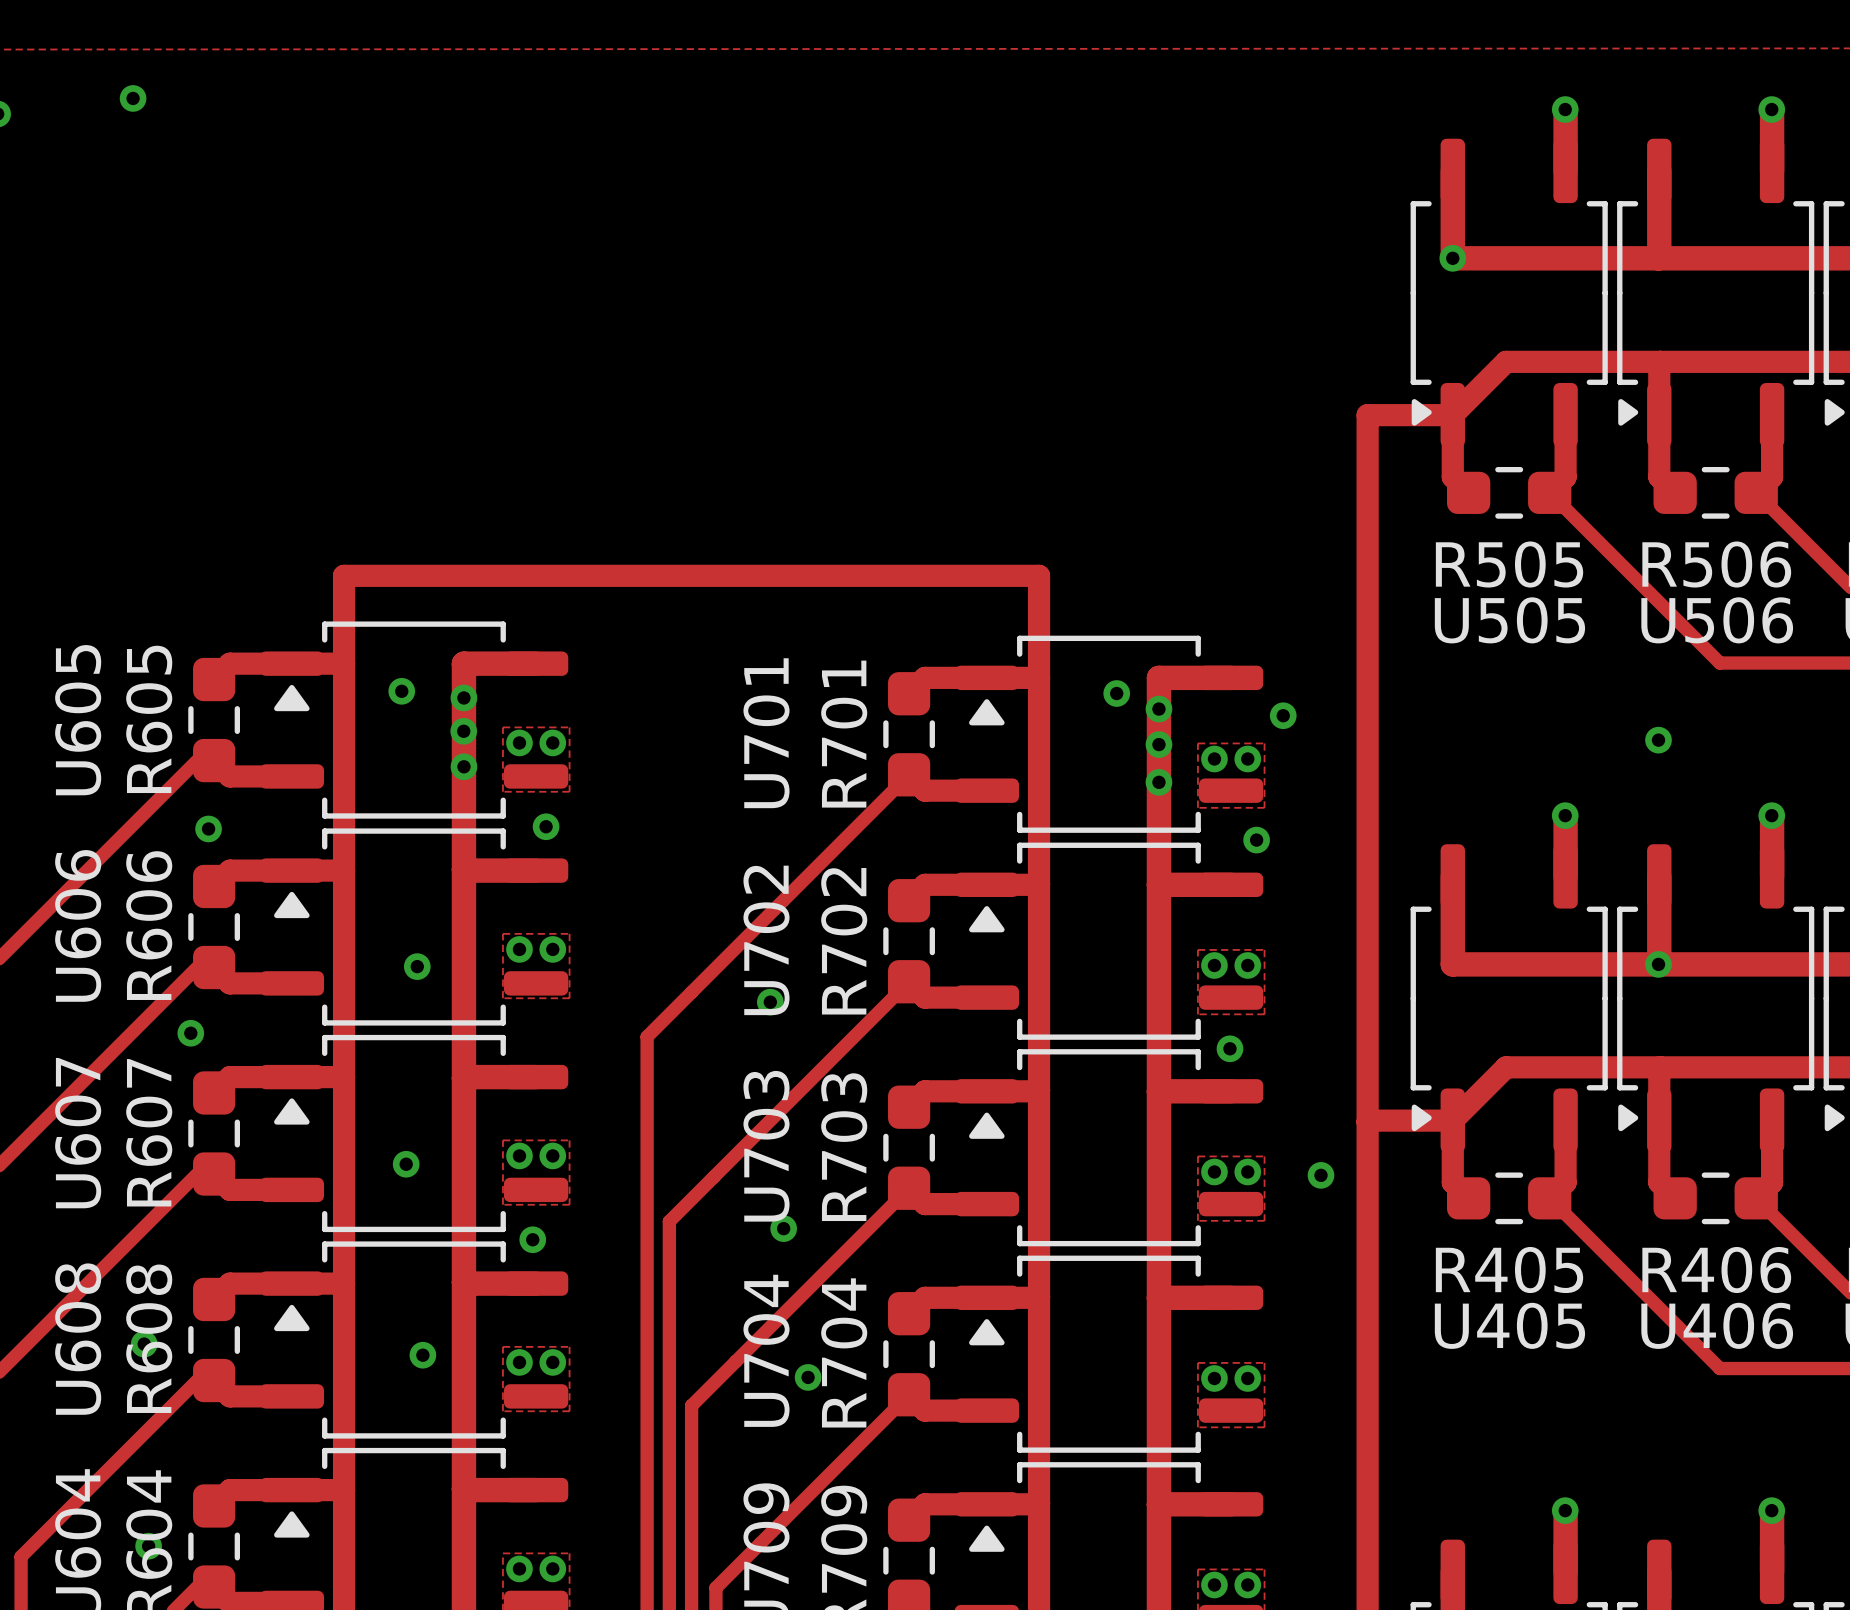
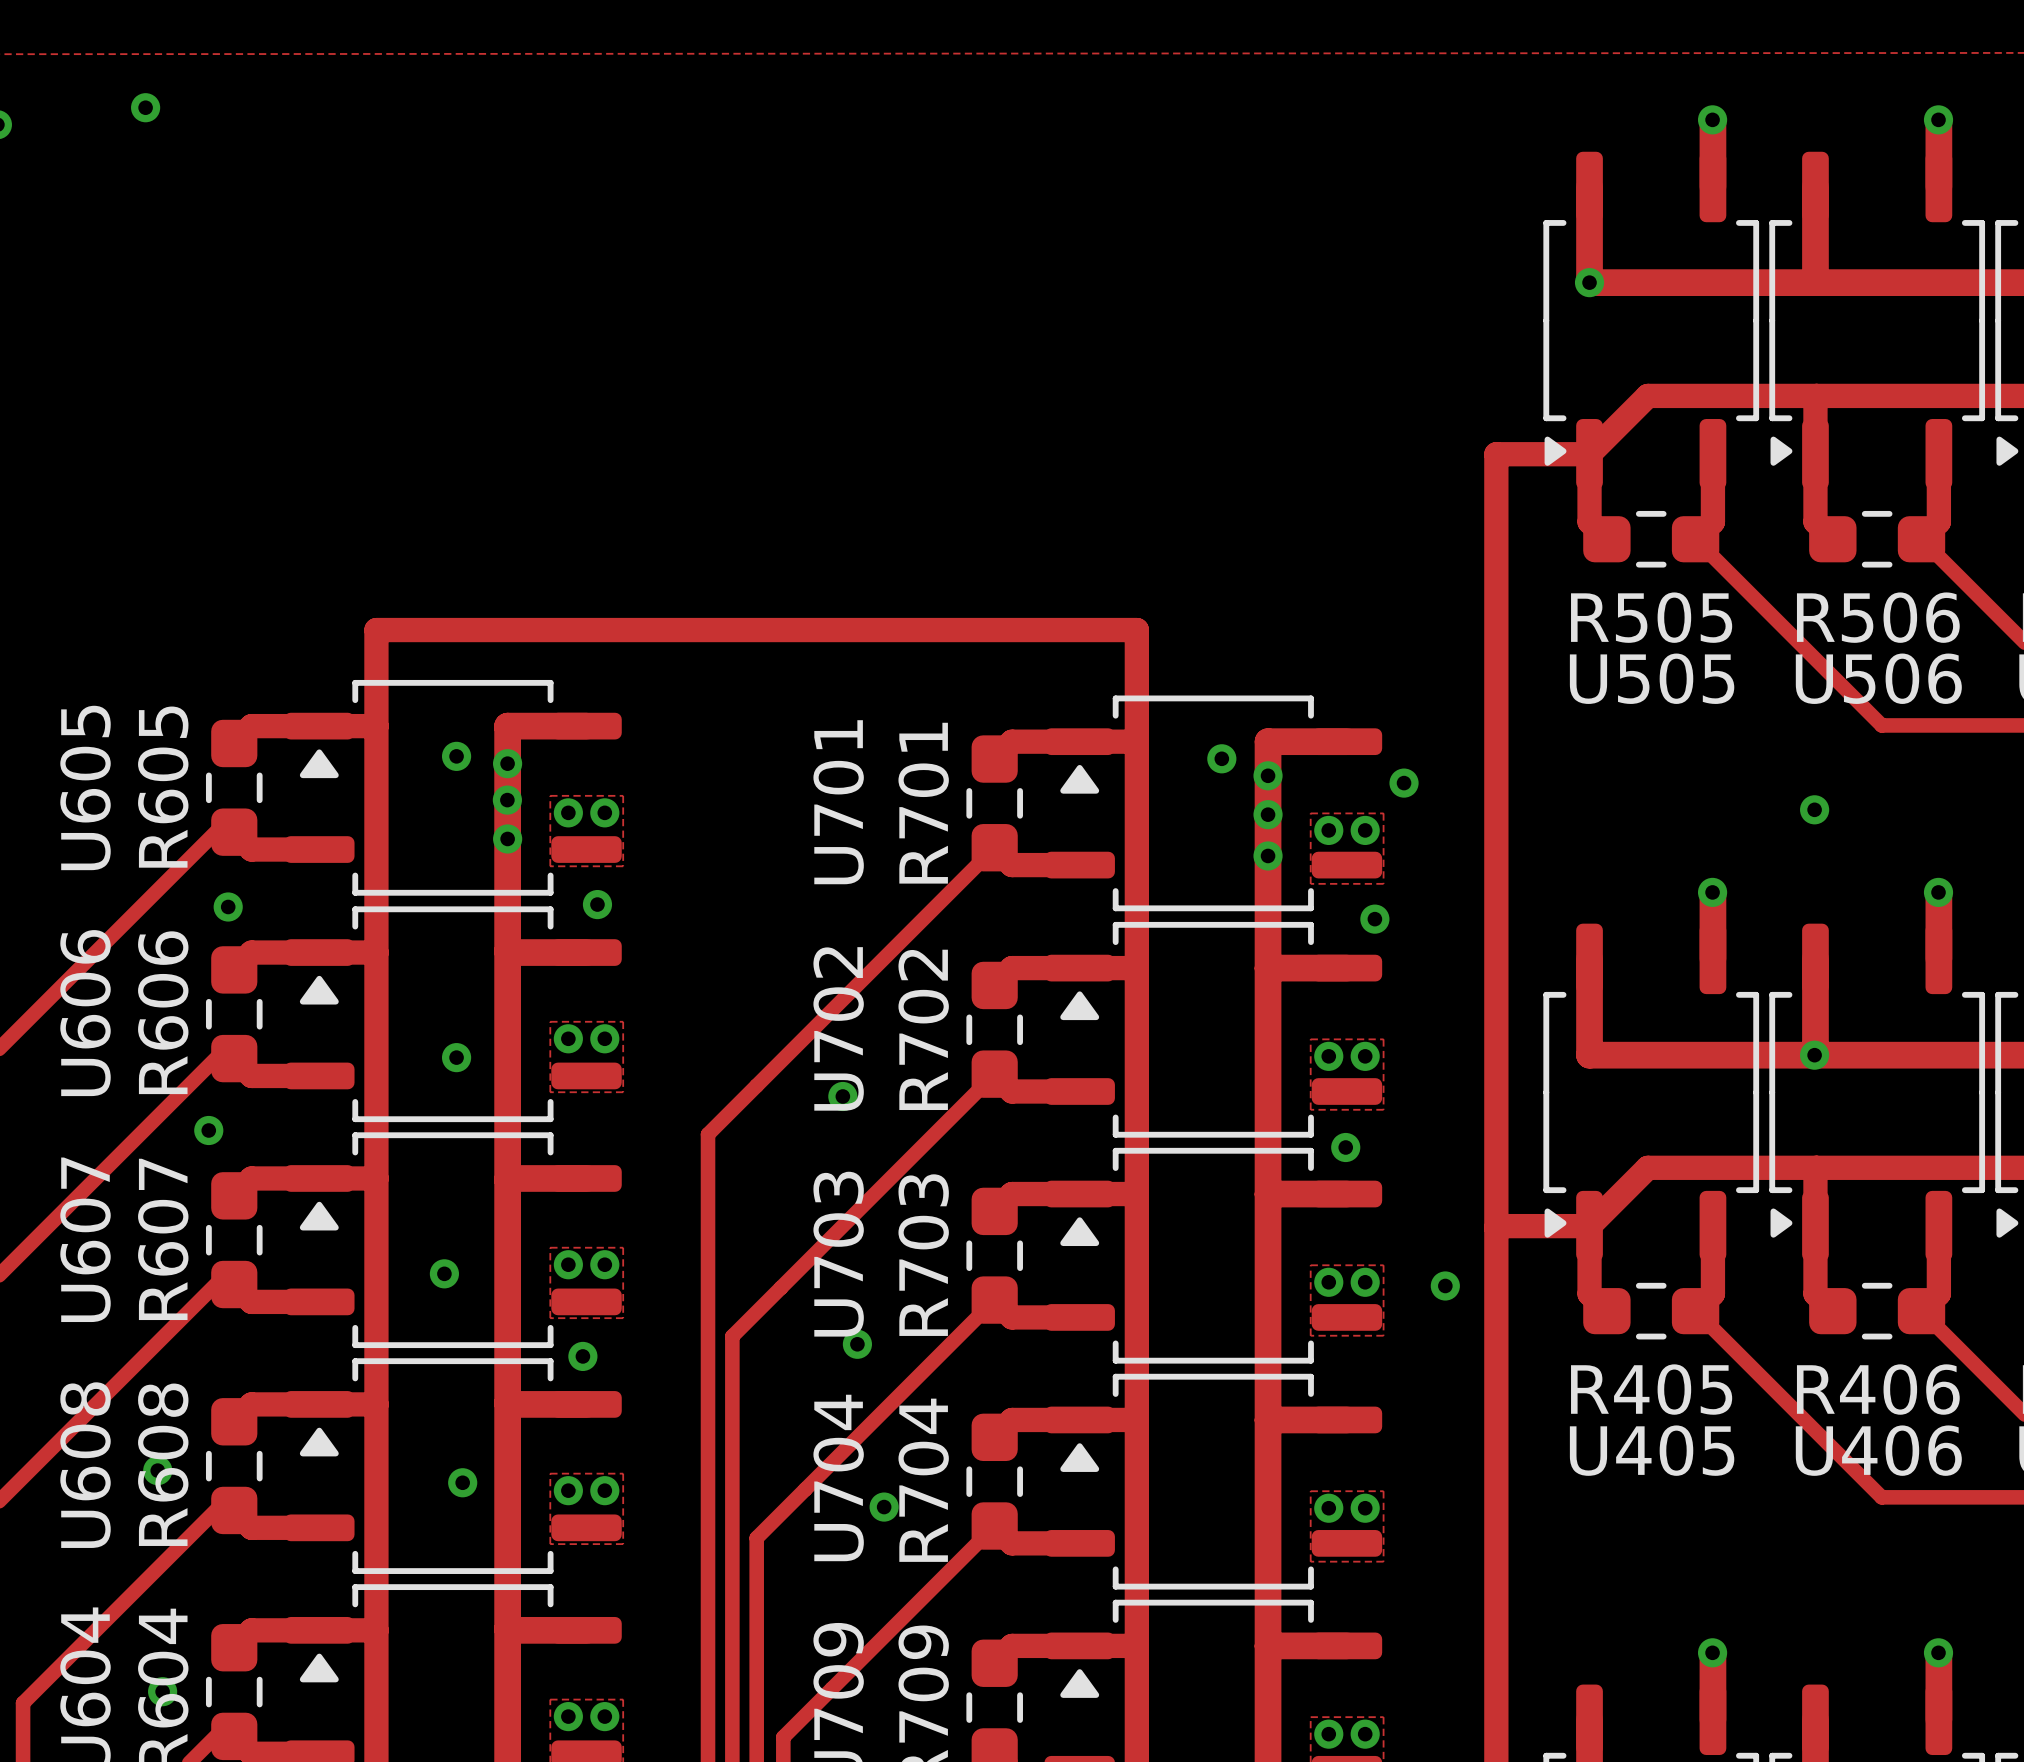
via position: (401, 691) -> (456, 756)

